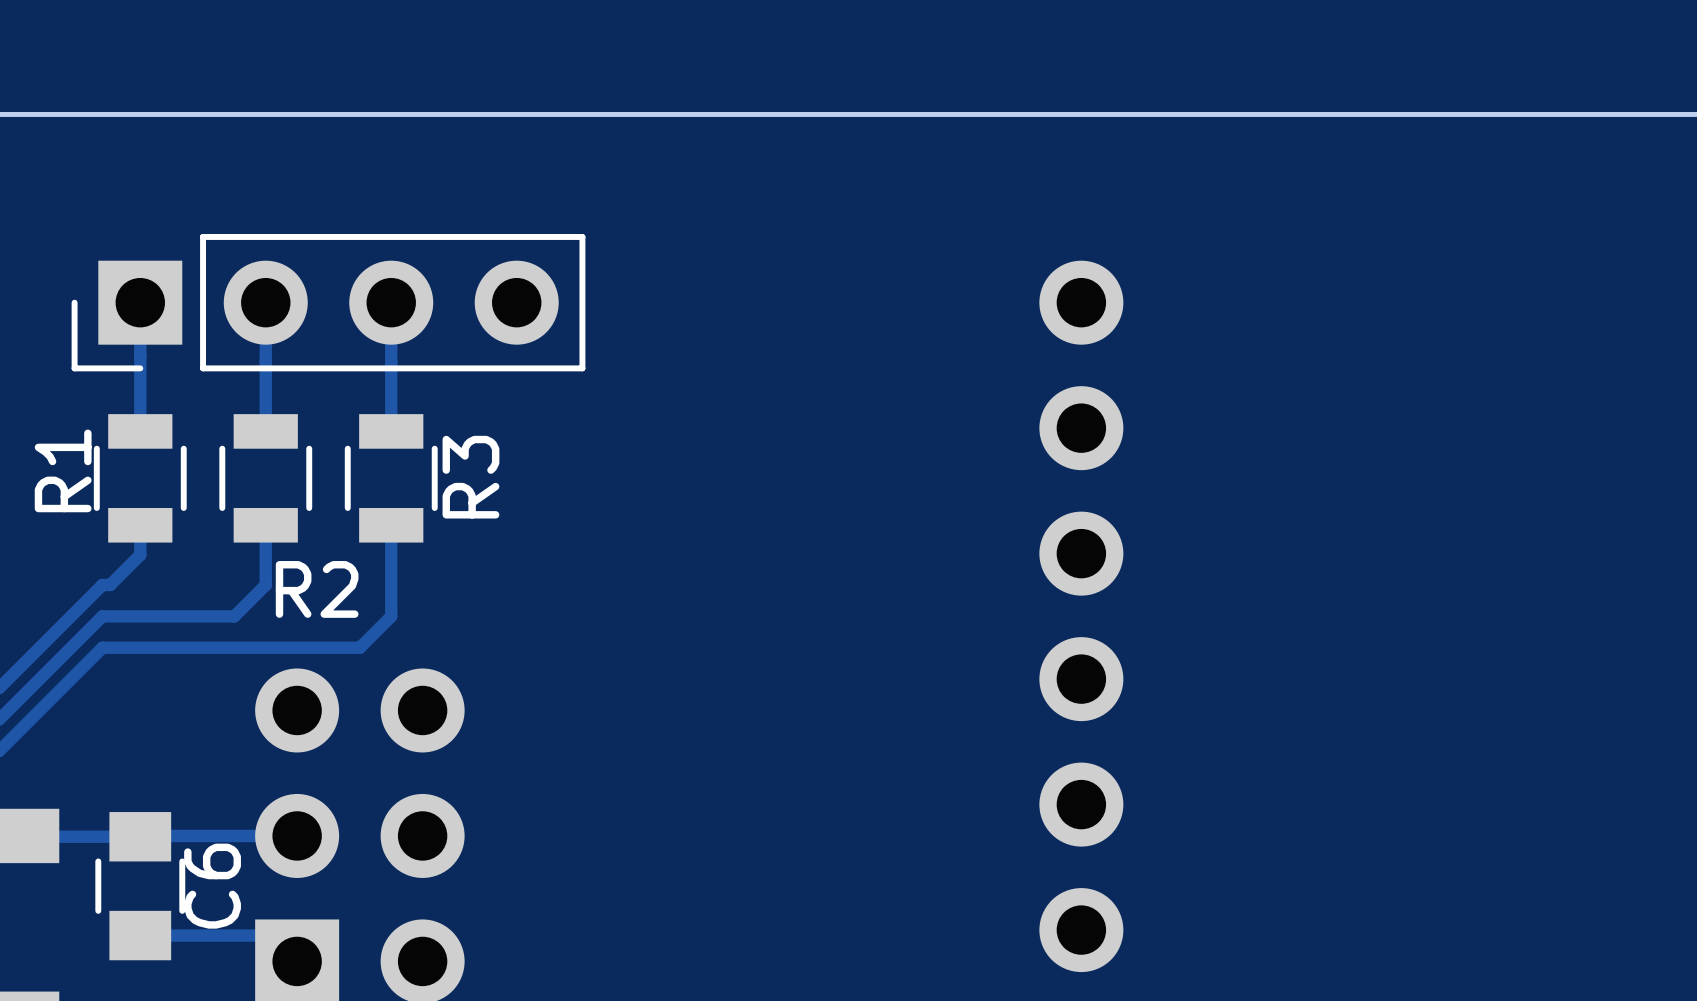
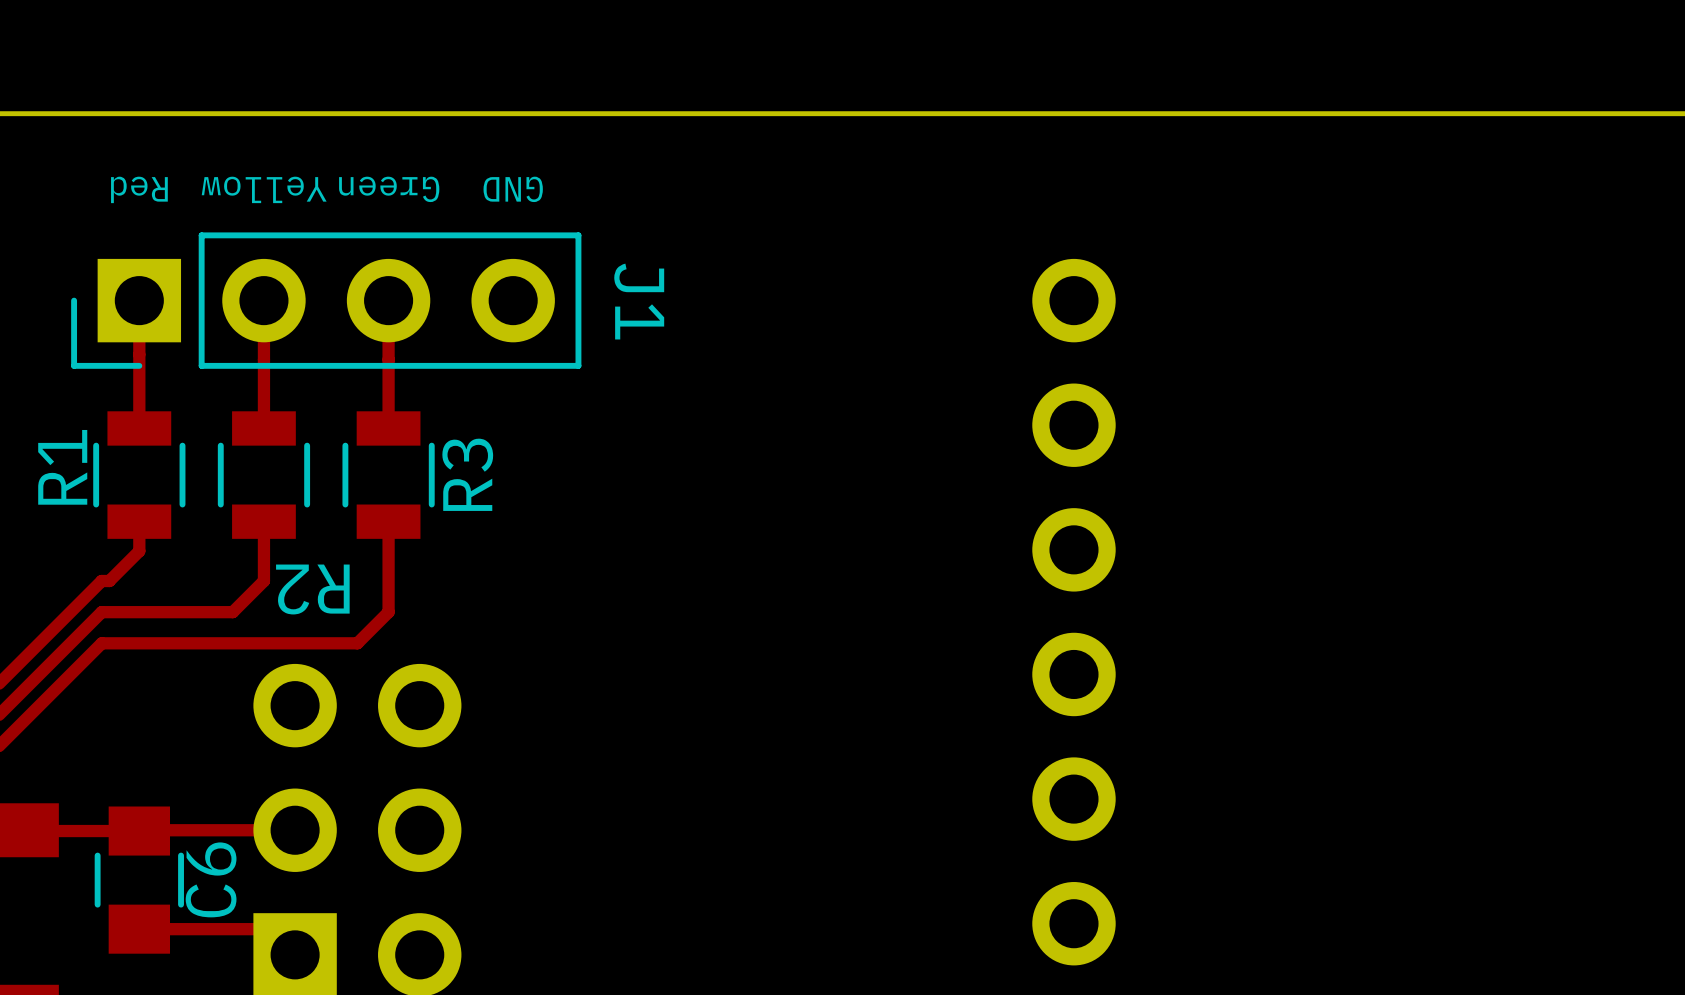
text: none -> Red (139, 189)
text: none -> Yellow (264, 189)
text: none -> Green (389, 189)
text: none -> GND (513, 189)
J1 name: none -> J1 (639, 301)
R2 name rotation: 0° (317, 589) -> 180° (312, 589)

